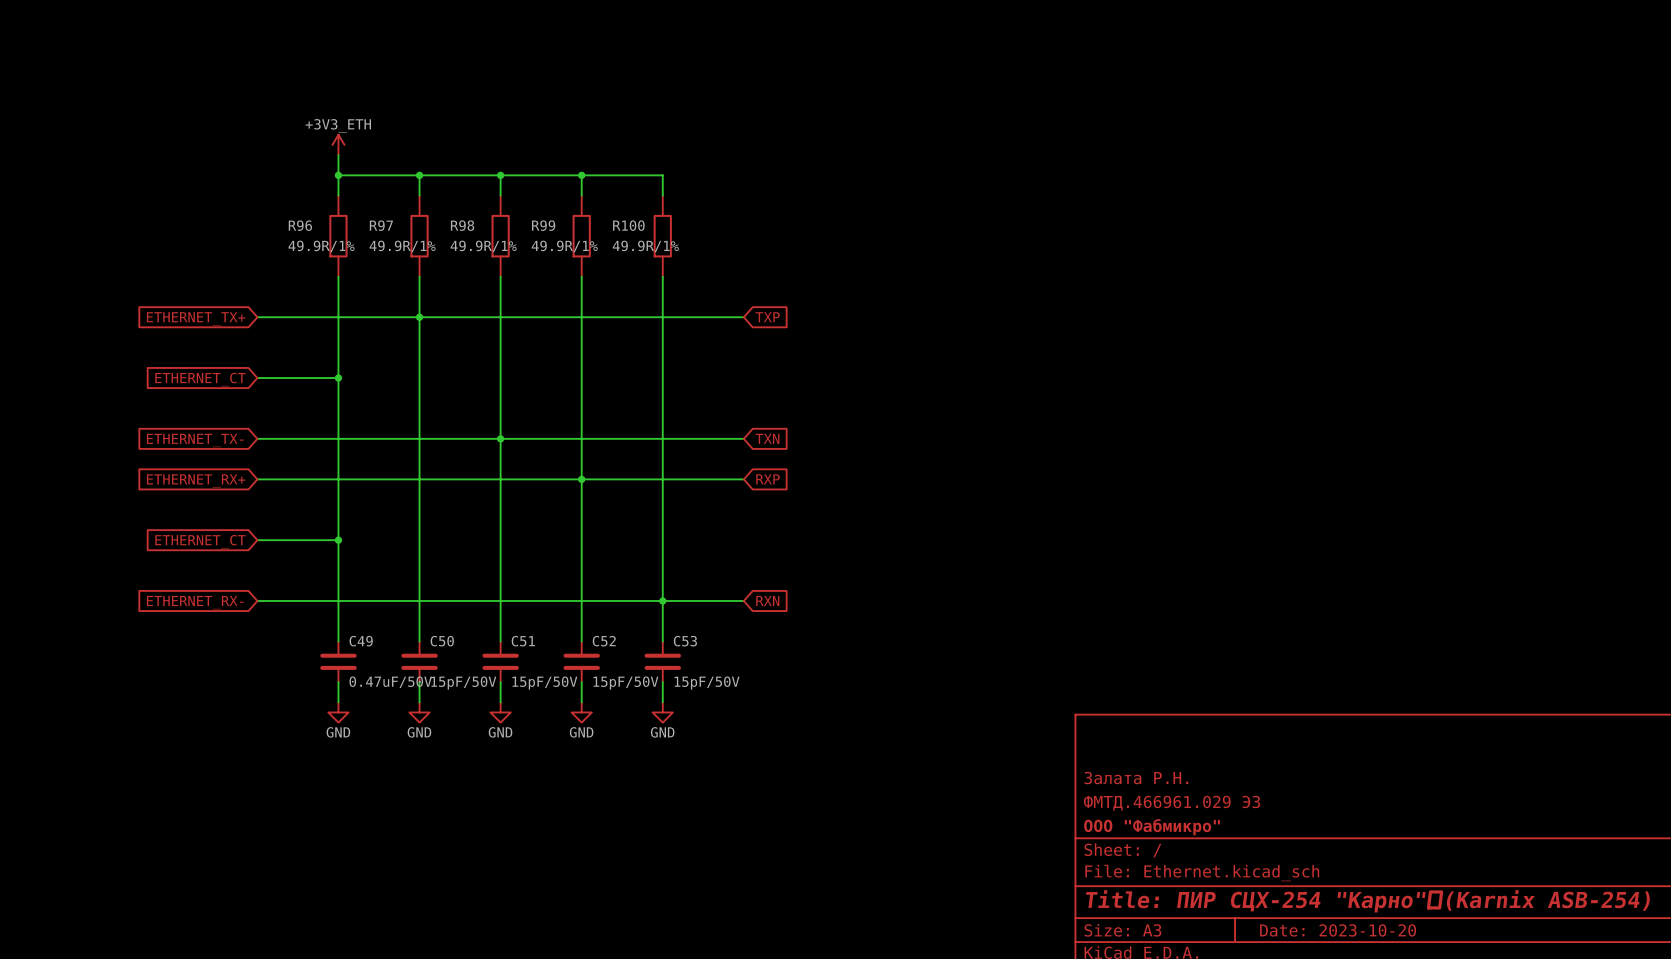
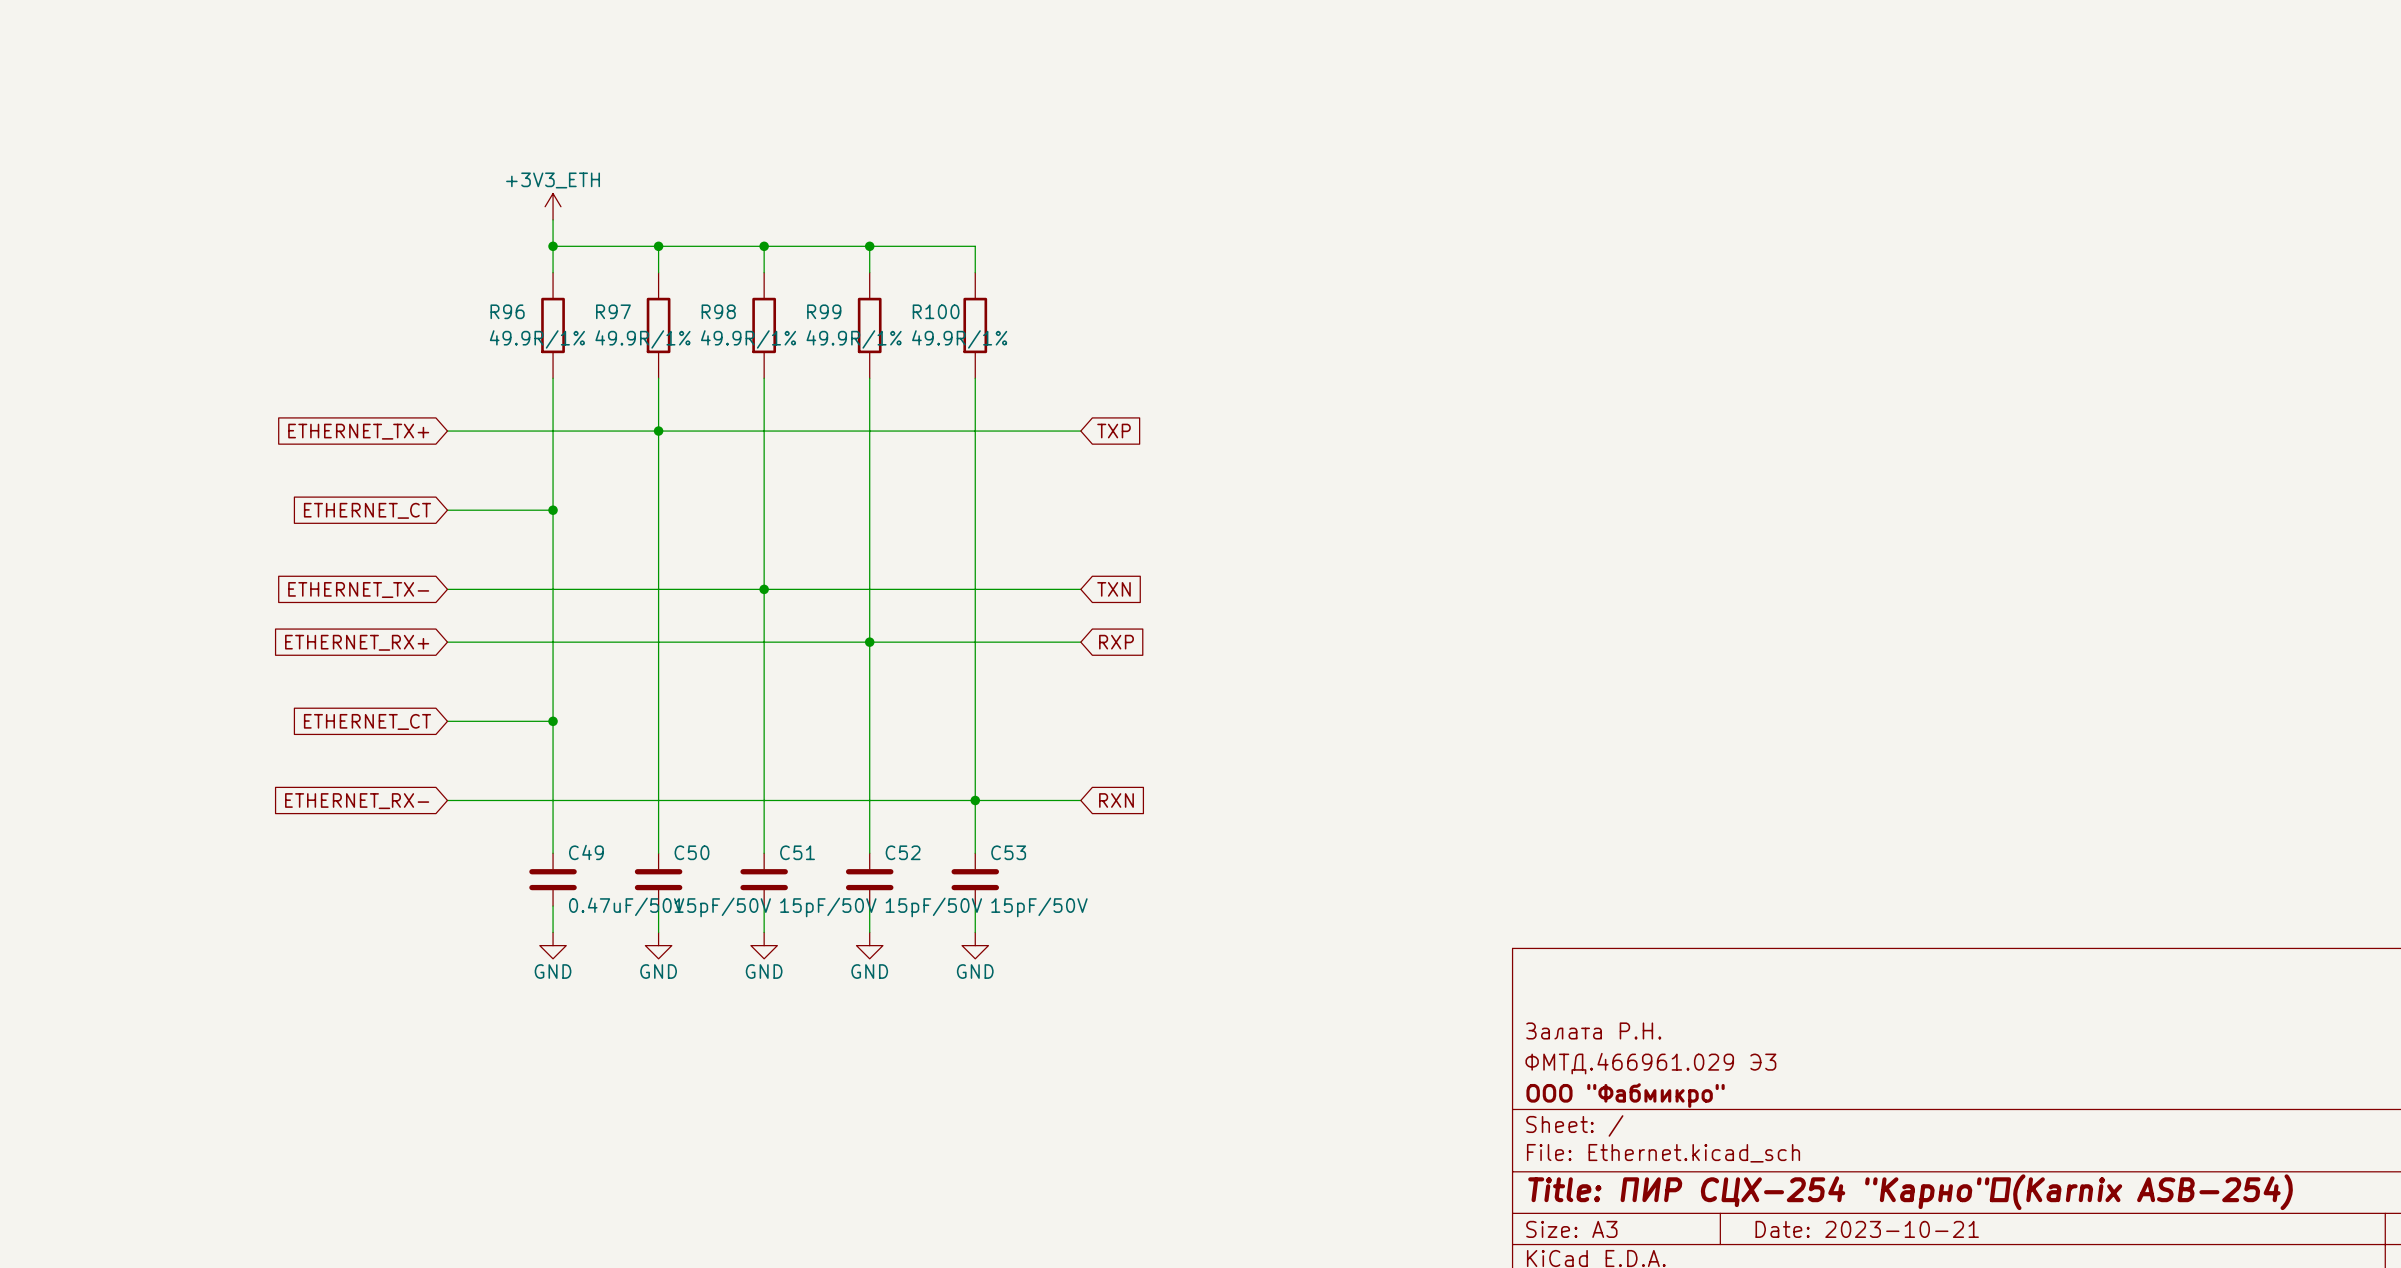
title block: Date: 2023-10-20 (1338, 930) -> Date: 2023-10-21 (1867, 1229)

